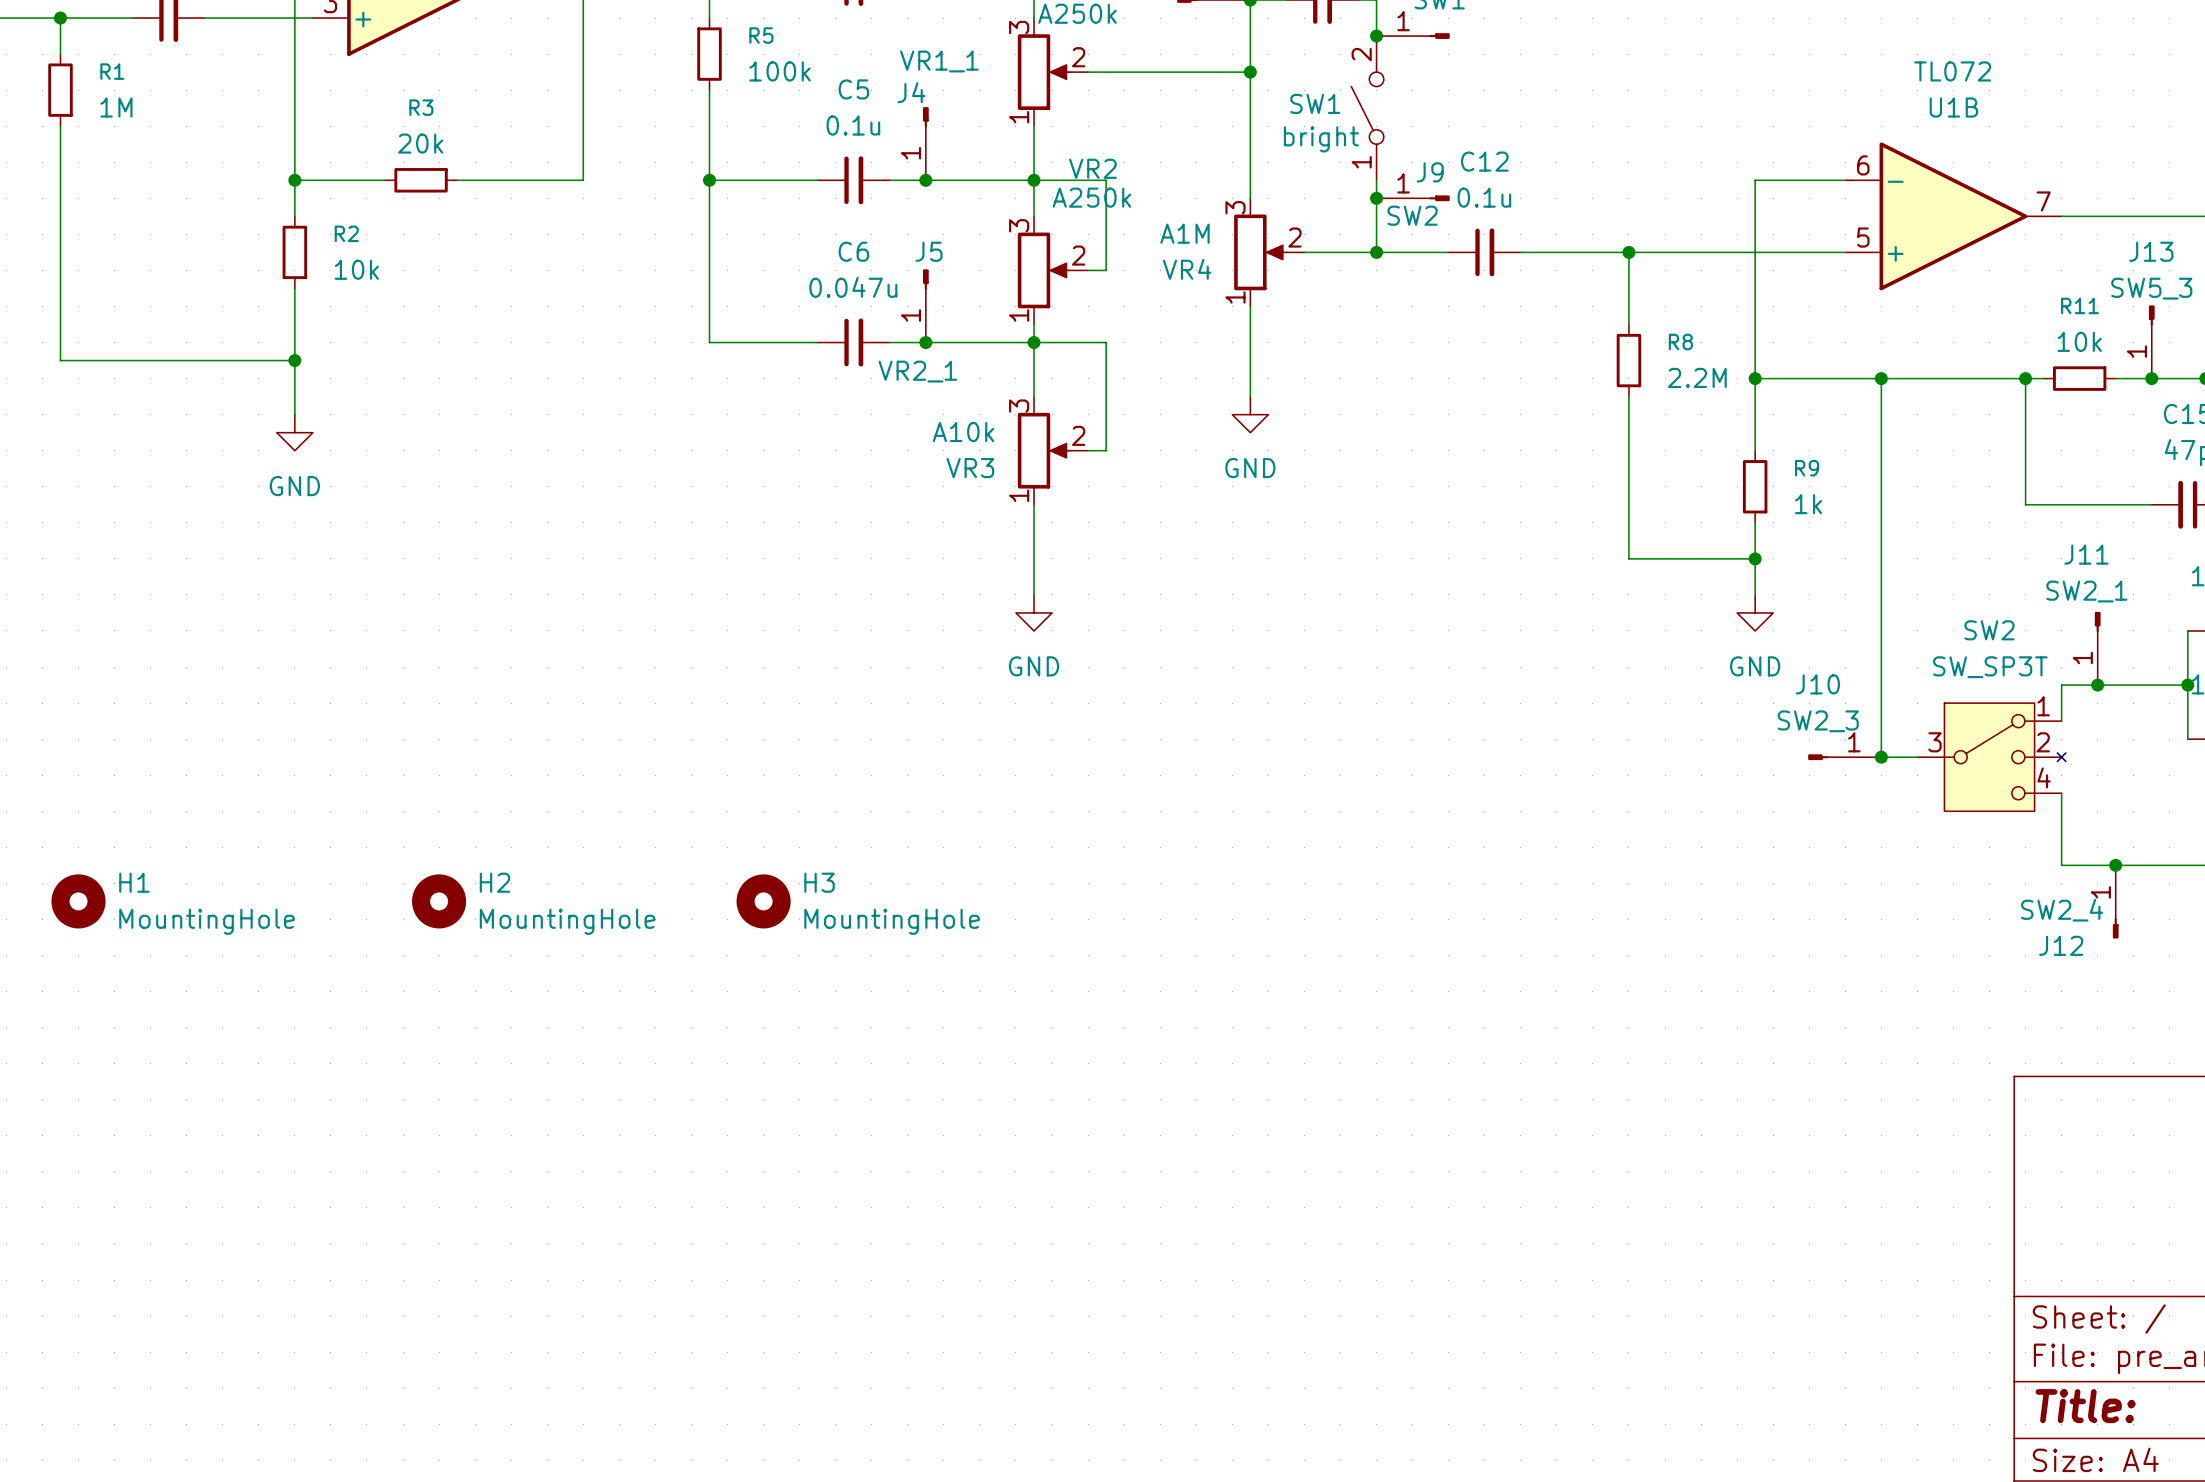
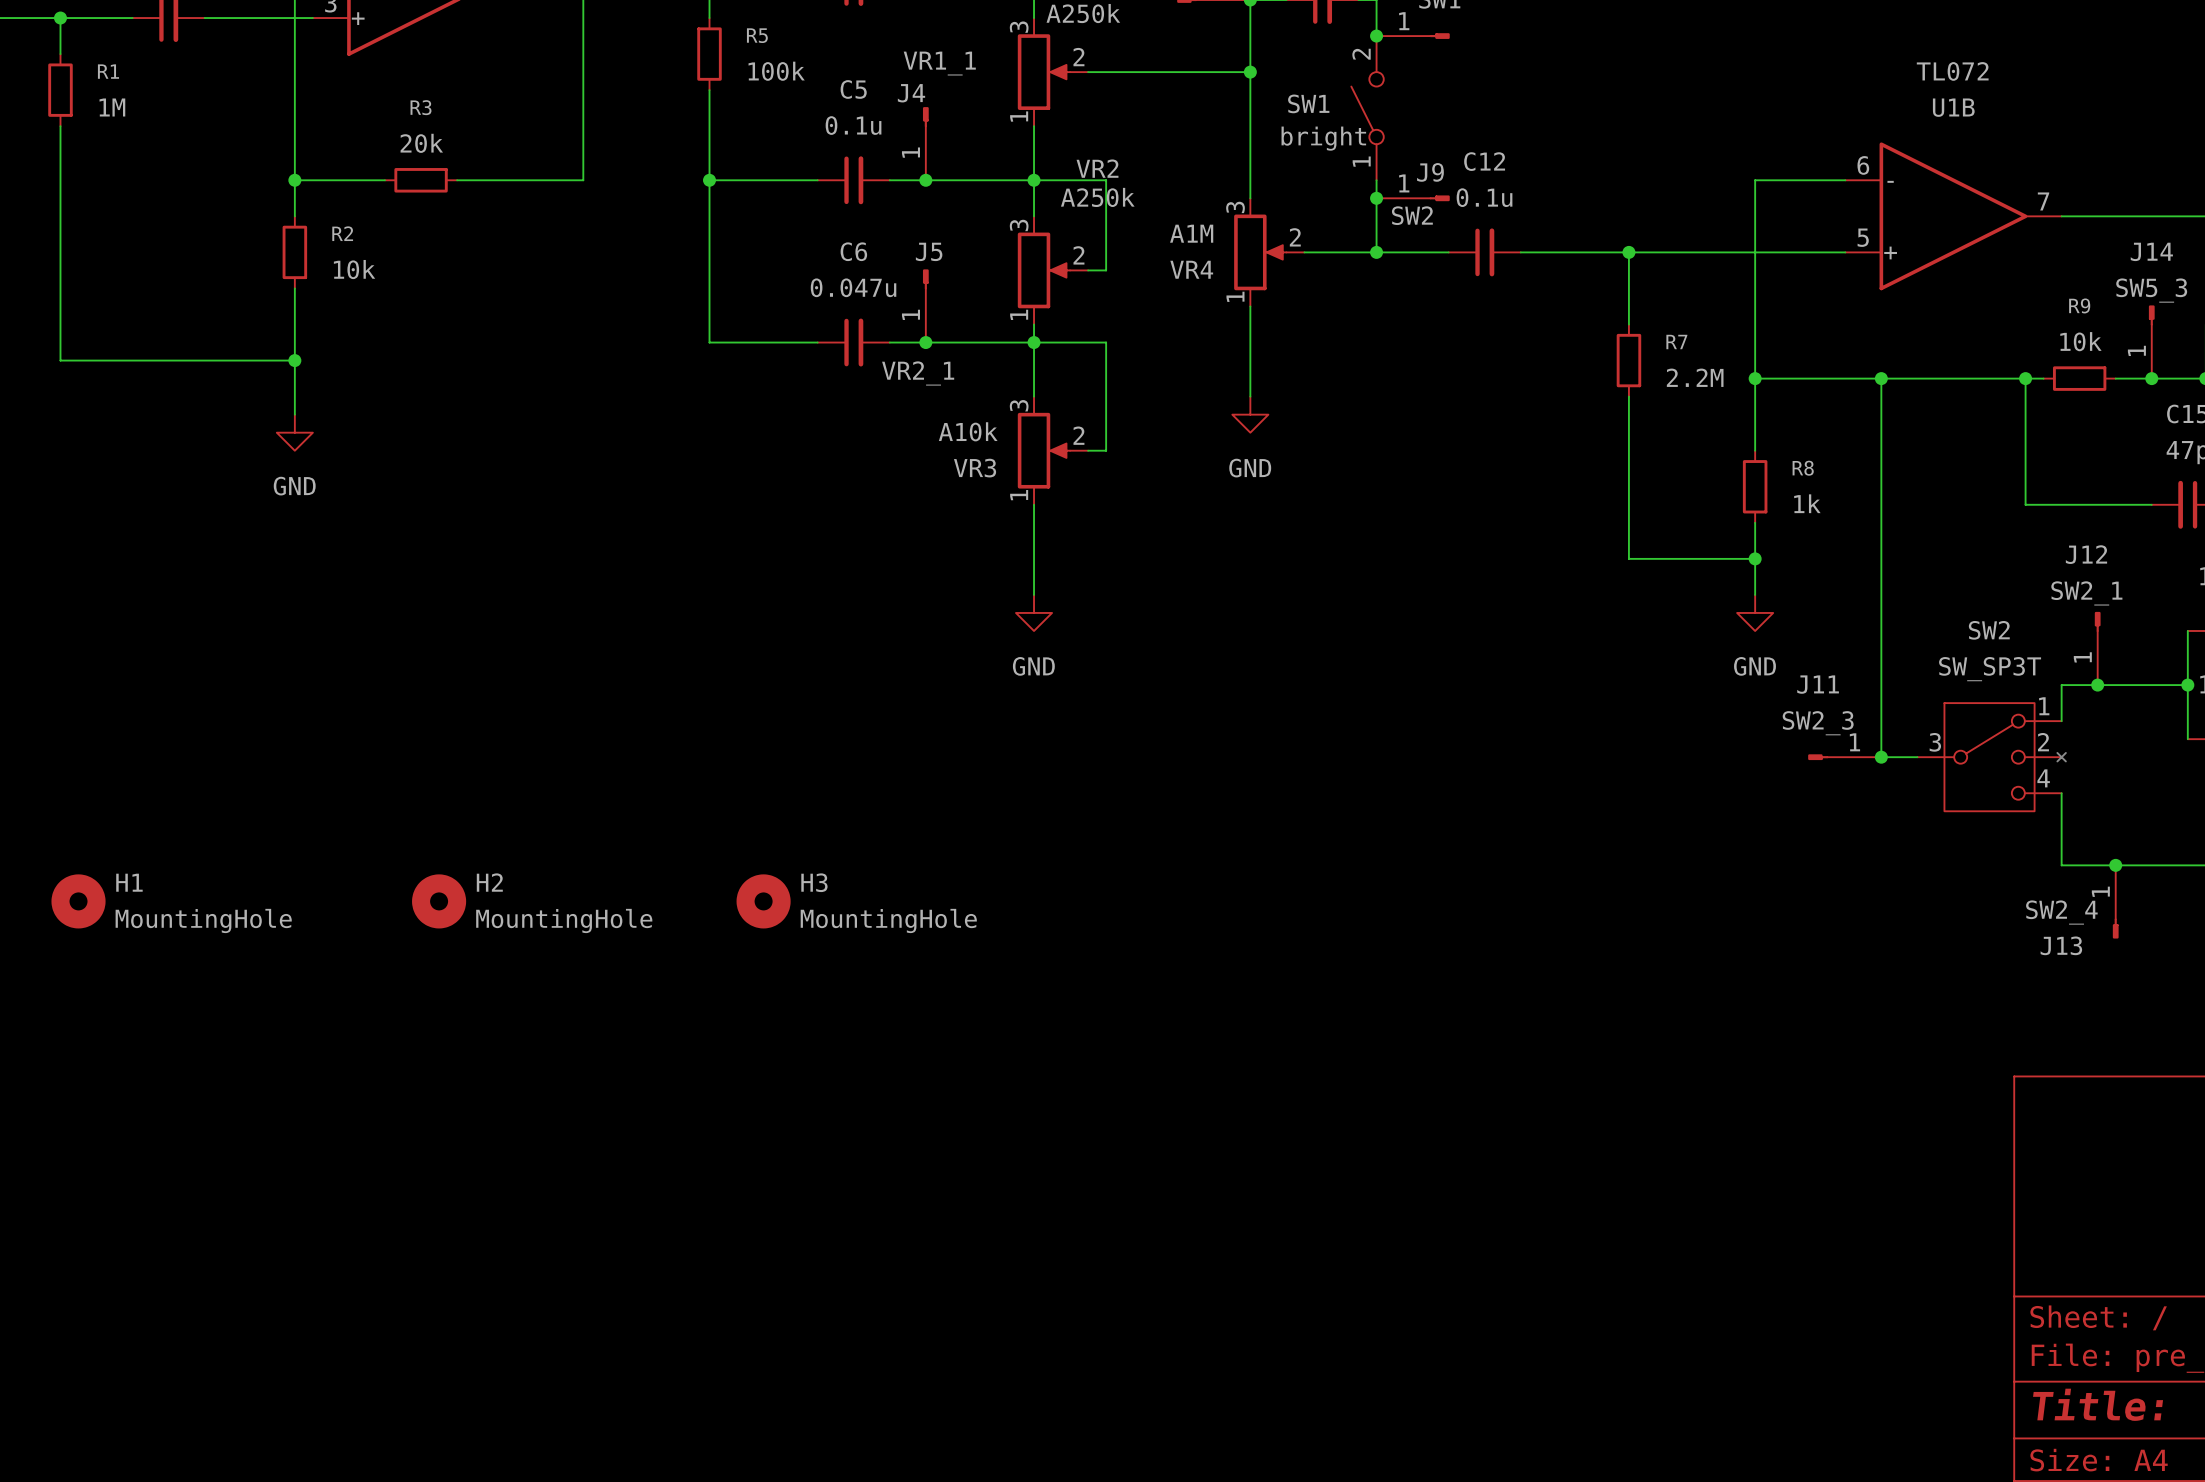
J13 name: J13 (2151, 251) -> J14 (2151, 251)
R11 name: R11 (2080, 305) -> R9 (2079, 305)
R8 name: R8 (1680, 342) -> R7 (1676, 342)
R9 name: R9 (1807, 468) -> R8 (1803, 468)
J11 name: J11 (2086, 554) -> J12 (2086, 554)
J10 name: J10 (1817, 684) -> J11 (1818, 684)
J12 name: J12 (2061, 945) -> J13 (2061, 945)

